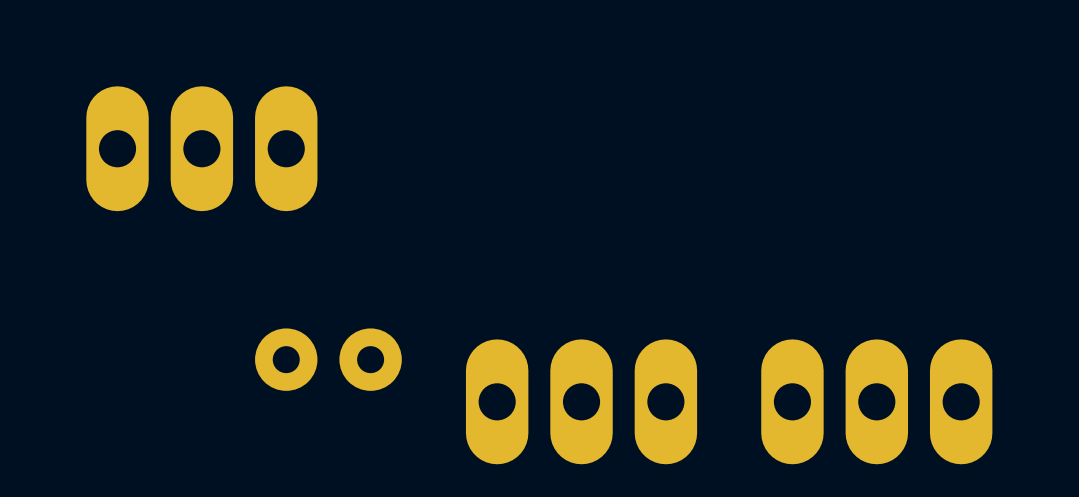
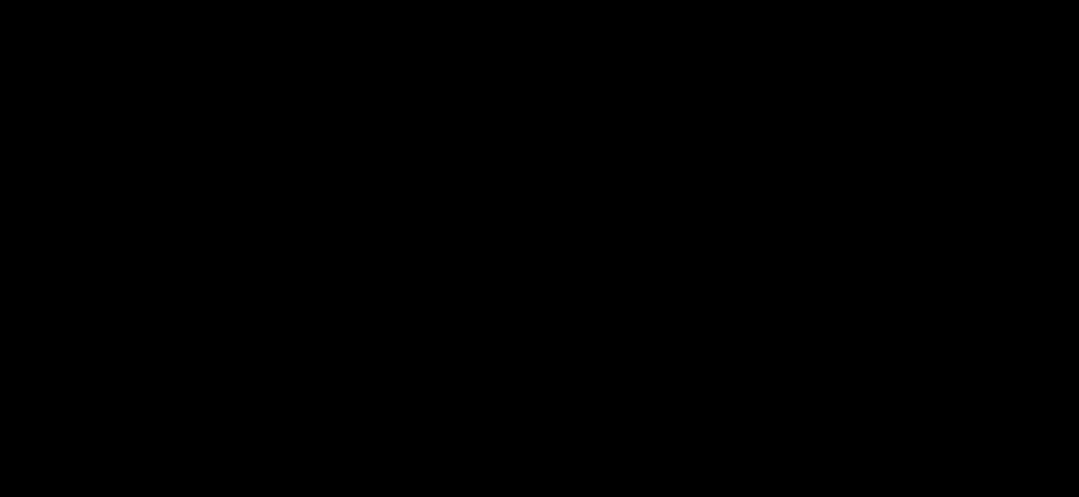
part: (201, 148) -> none
part: (328, 359) -> none
part: (581, 401) -> none
part: (876, 401) -> none

